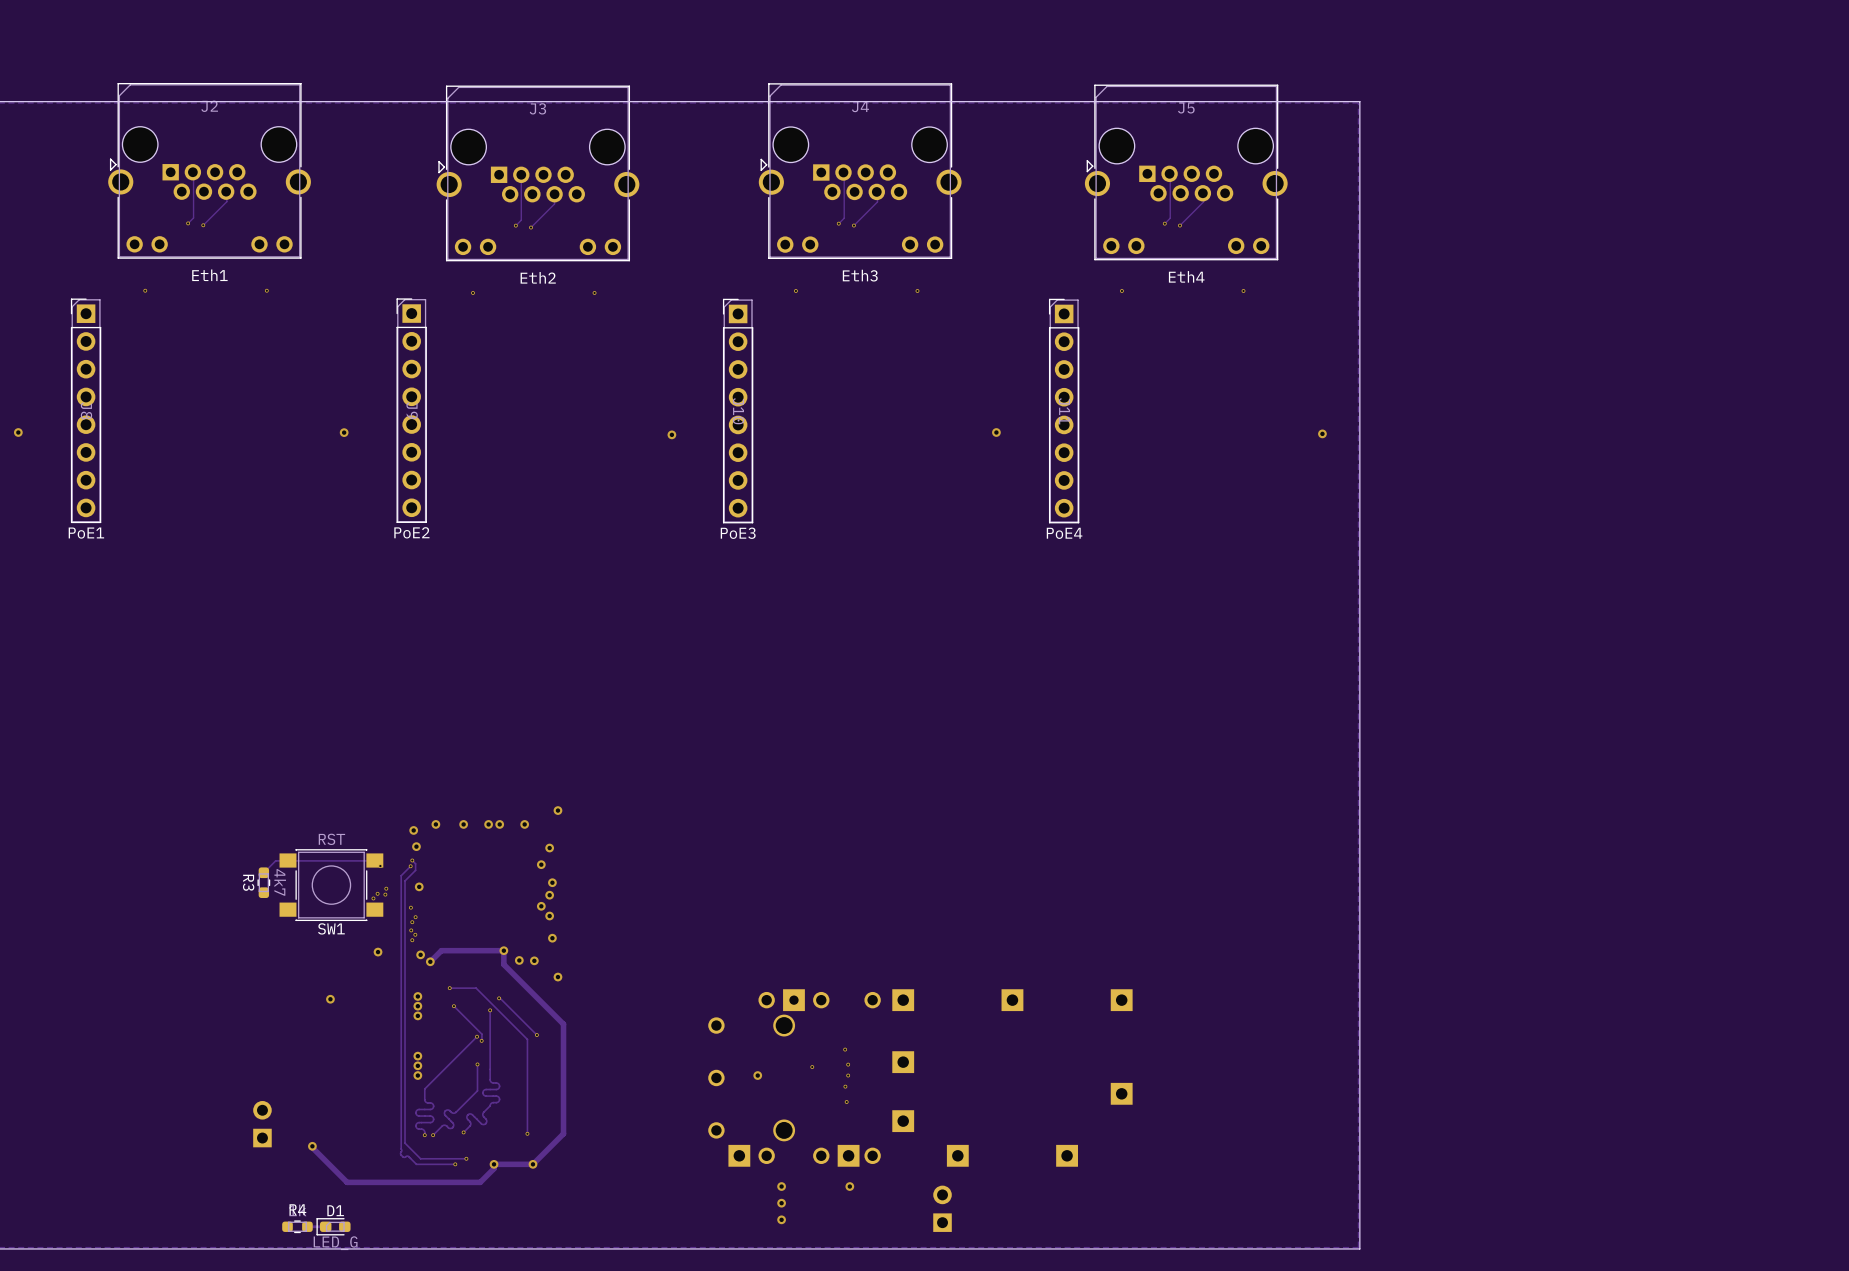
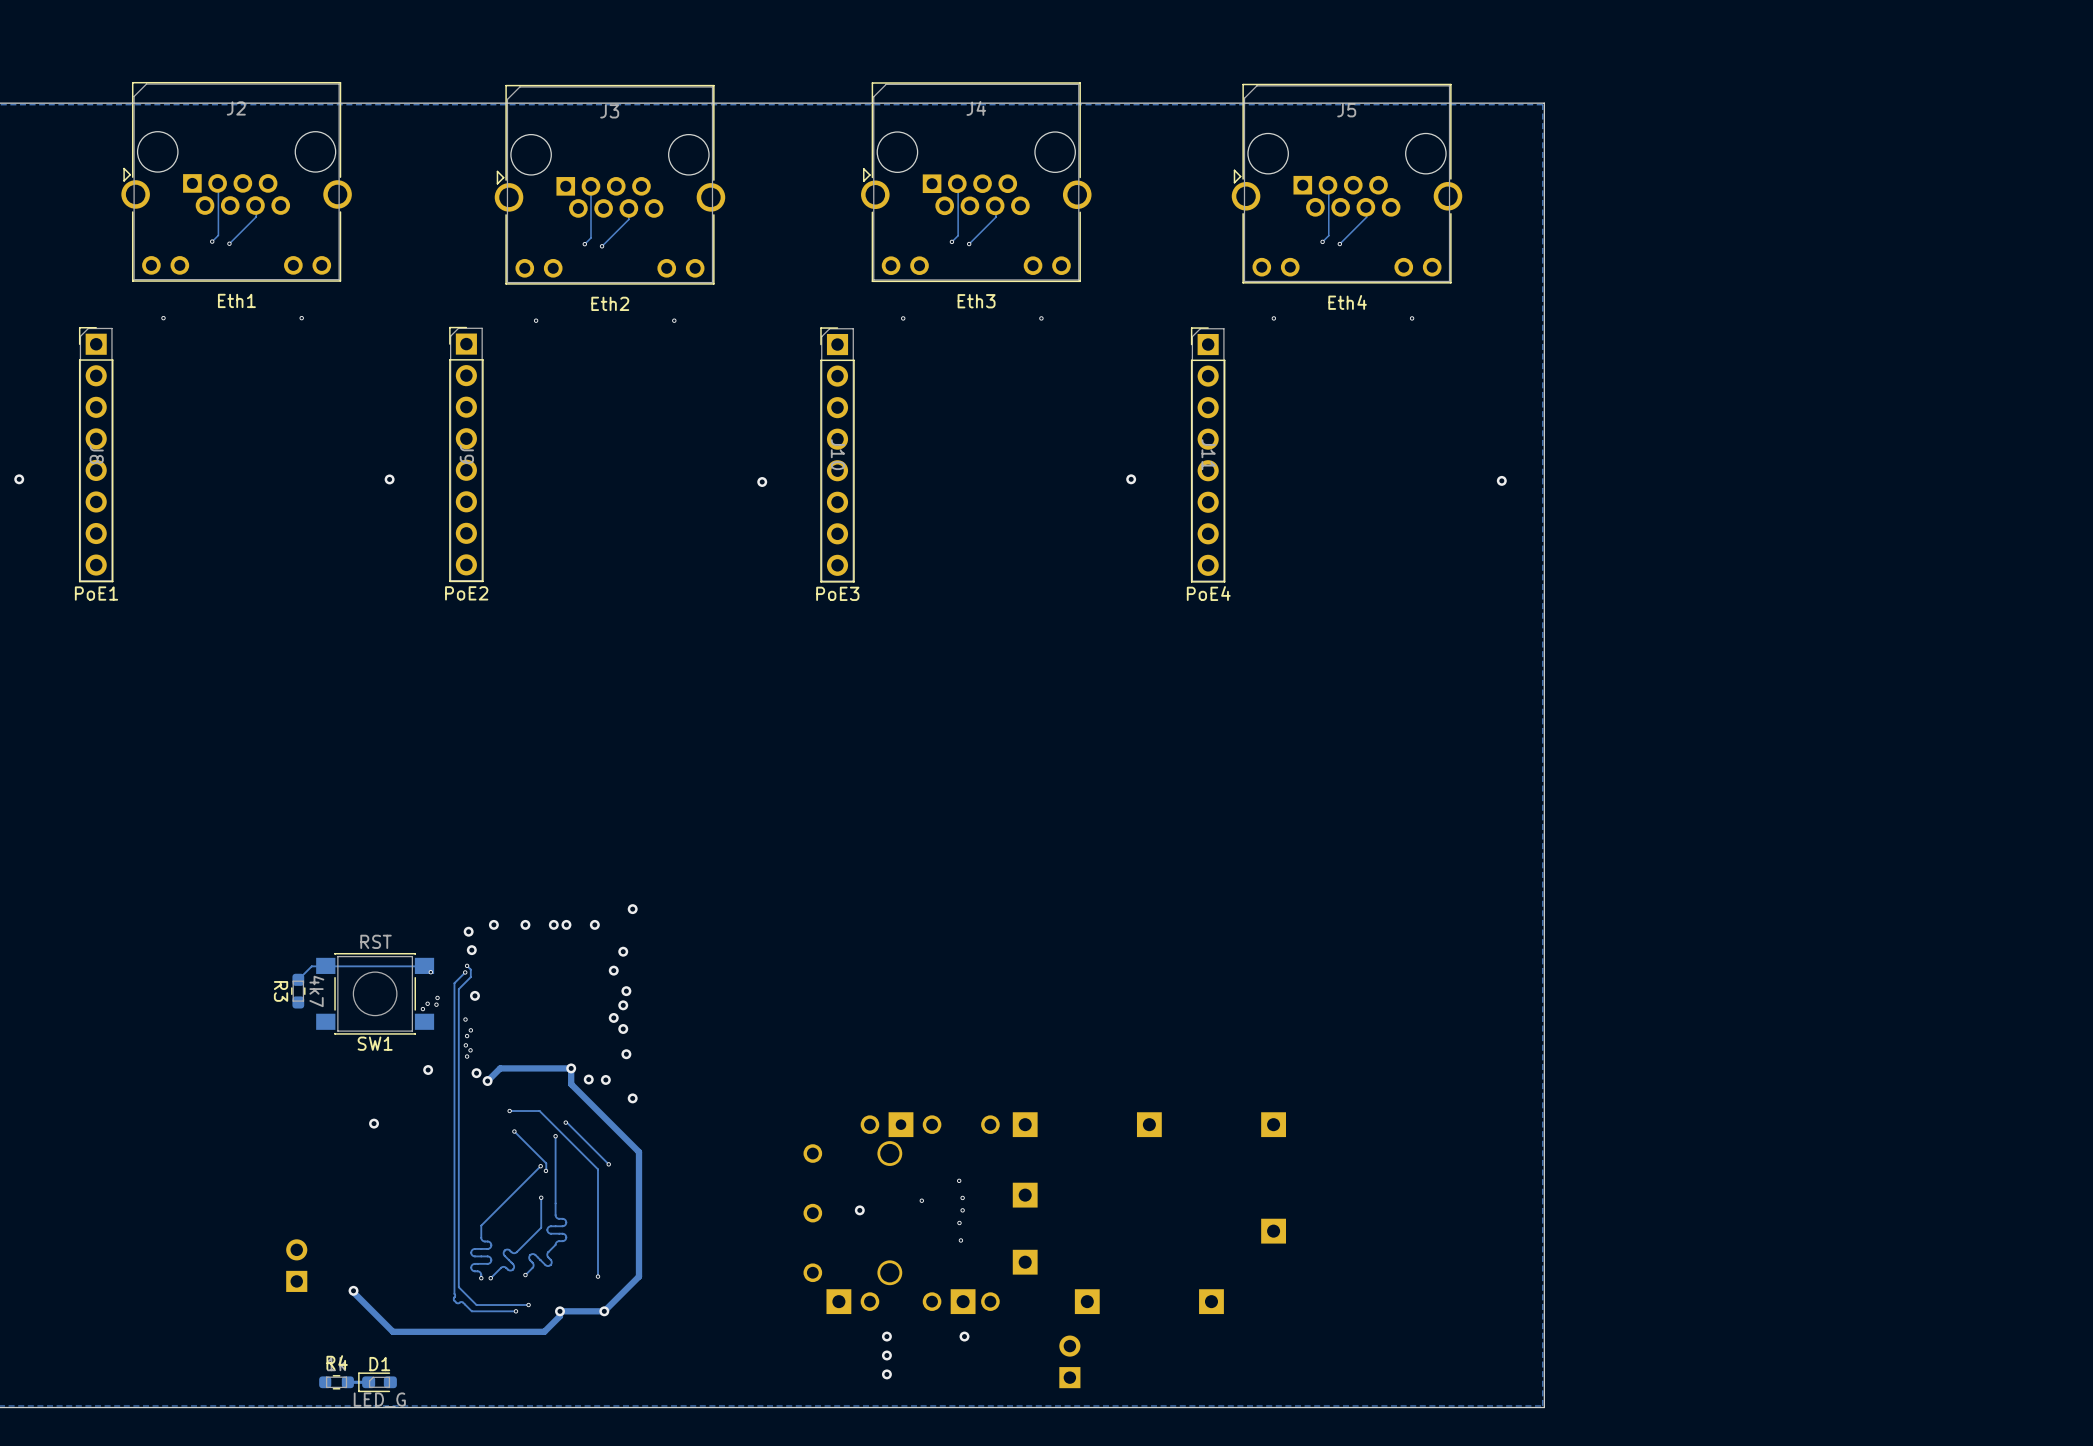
via: (417, 996) -> none
via: (417, 1006) -> none
via: (417, 1015) -> none
via: (417, 1056) -> none
via: (417, 1065) -> none
via: (417, 1075) -> none

